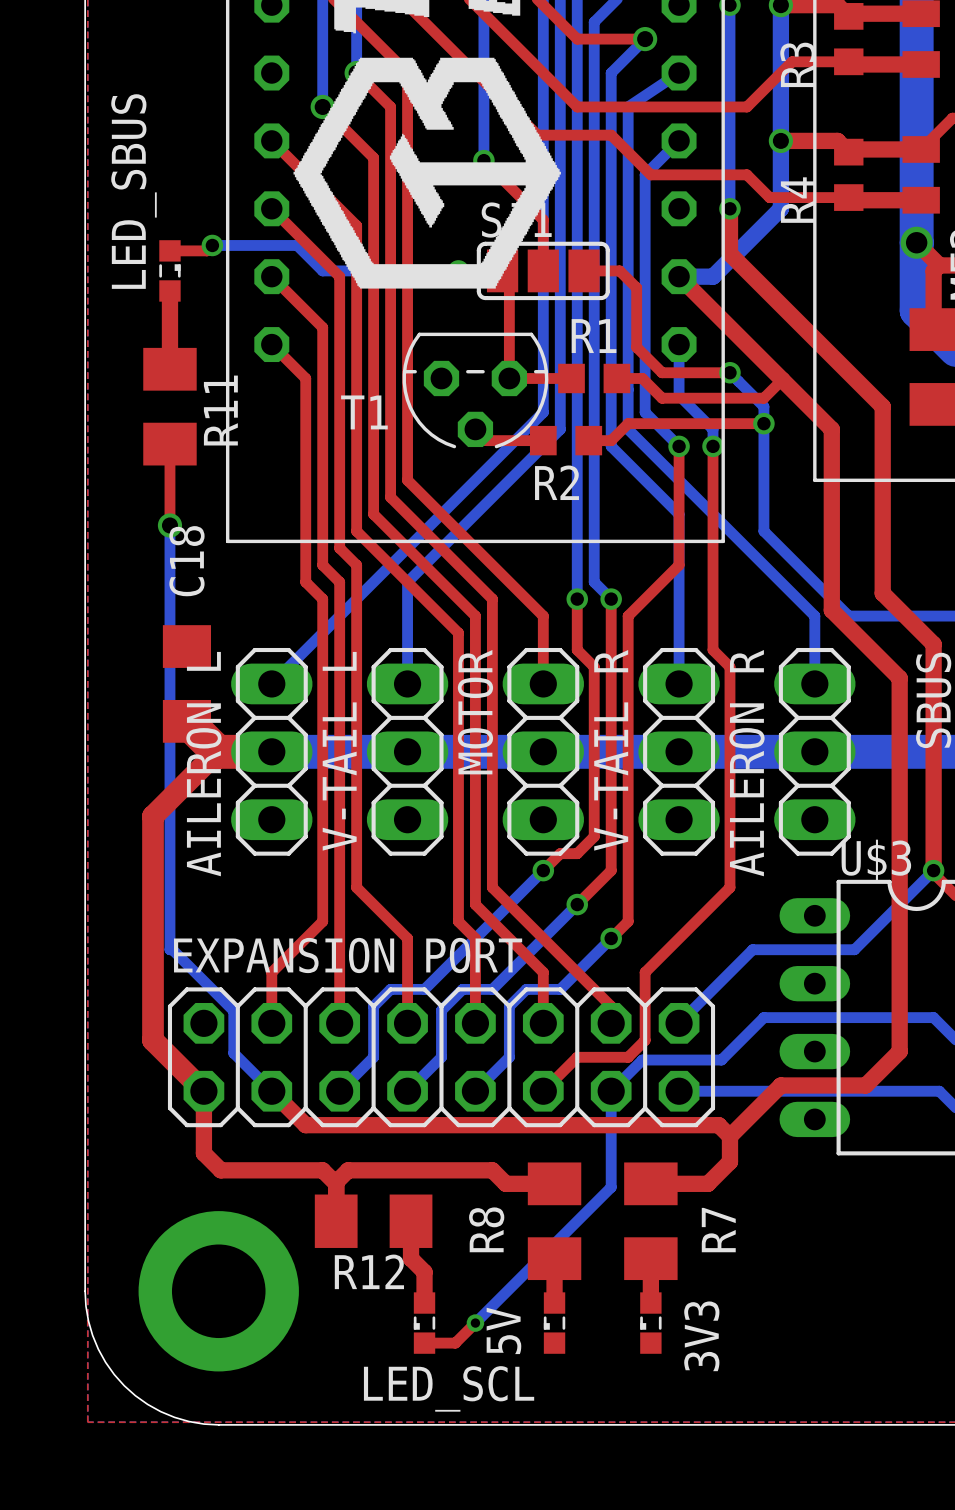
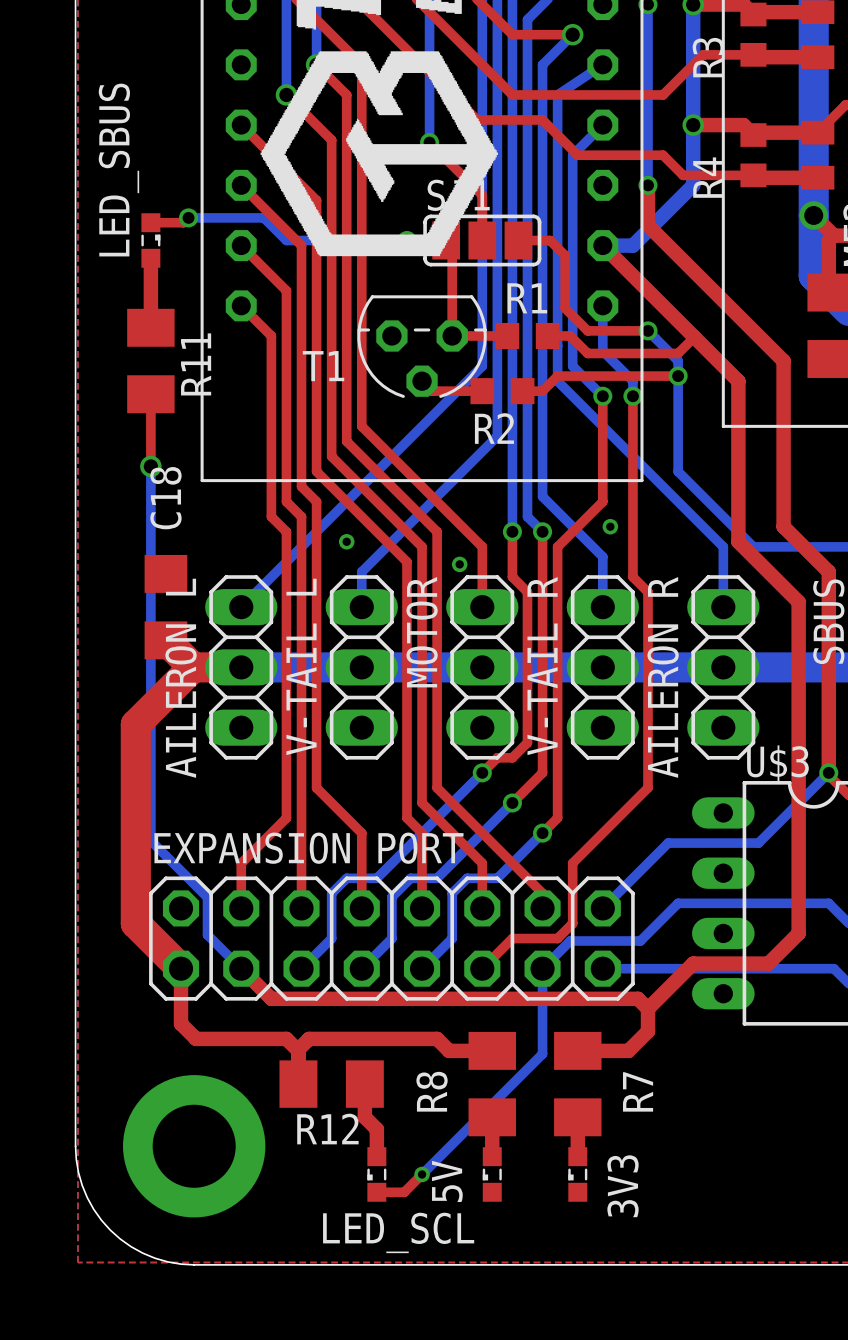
bottom track: (560, 429) (407, 582) (407, 644) -> (497, 381) (497, 436) (361, 571)
bottom track: (611, 446) (679, 514) (679, 627) -> (542, 396) (542, 496) (602, 556)
via: none -> (610, 526)
via: none -> (346, 541)
via: none -> (459, 564)
top track width: thin (217, 751) (153, 816) (153, 1040) (203, 1091) -> thick (192, 667) (135, 724) (135, 923) (181, 968)

